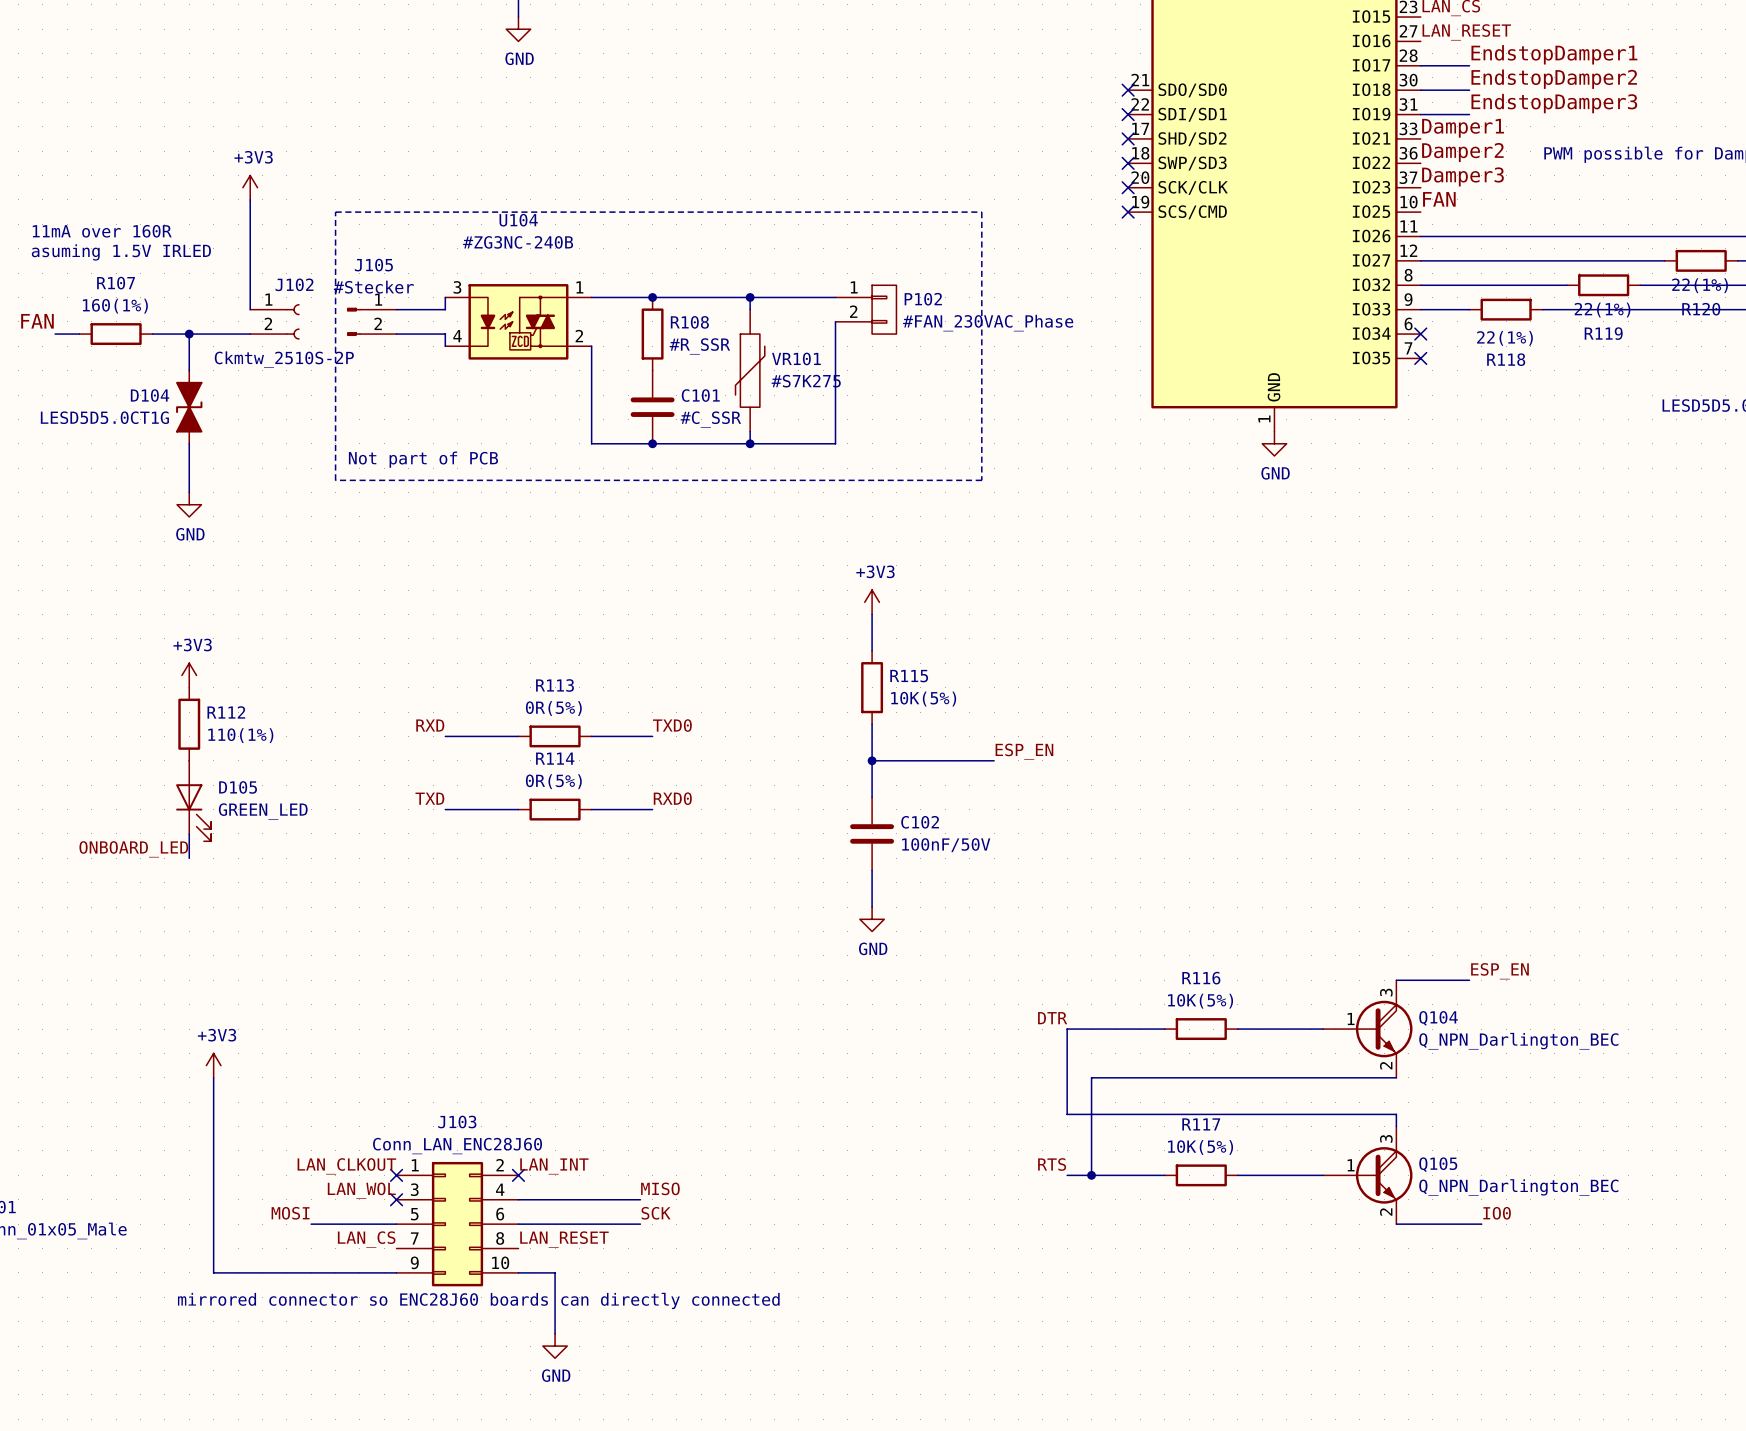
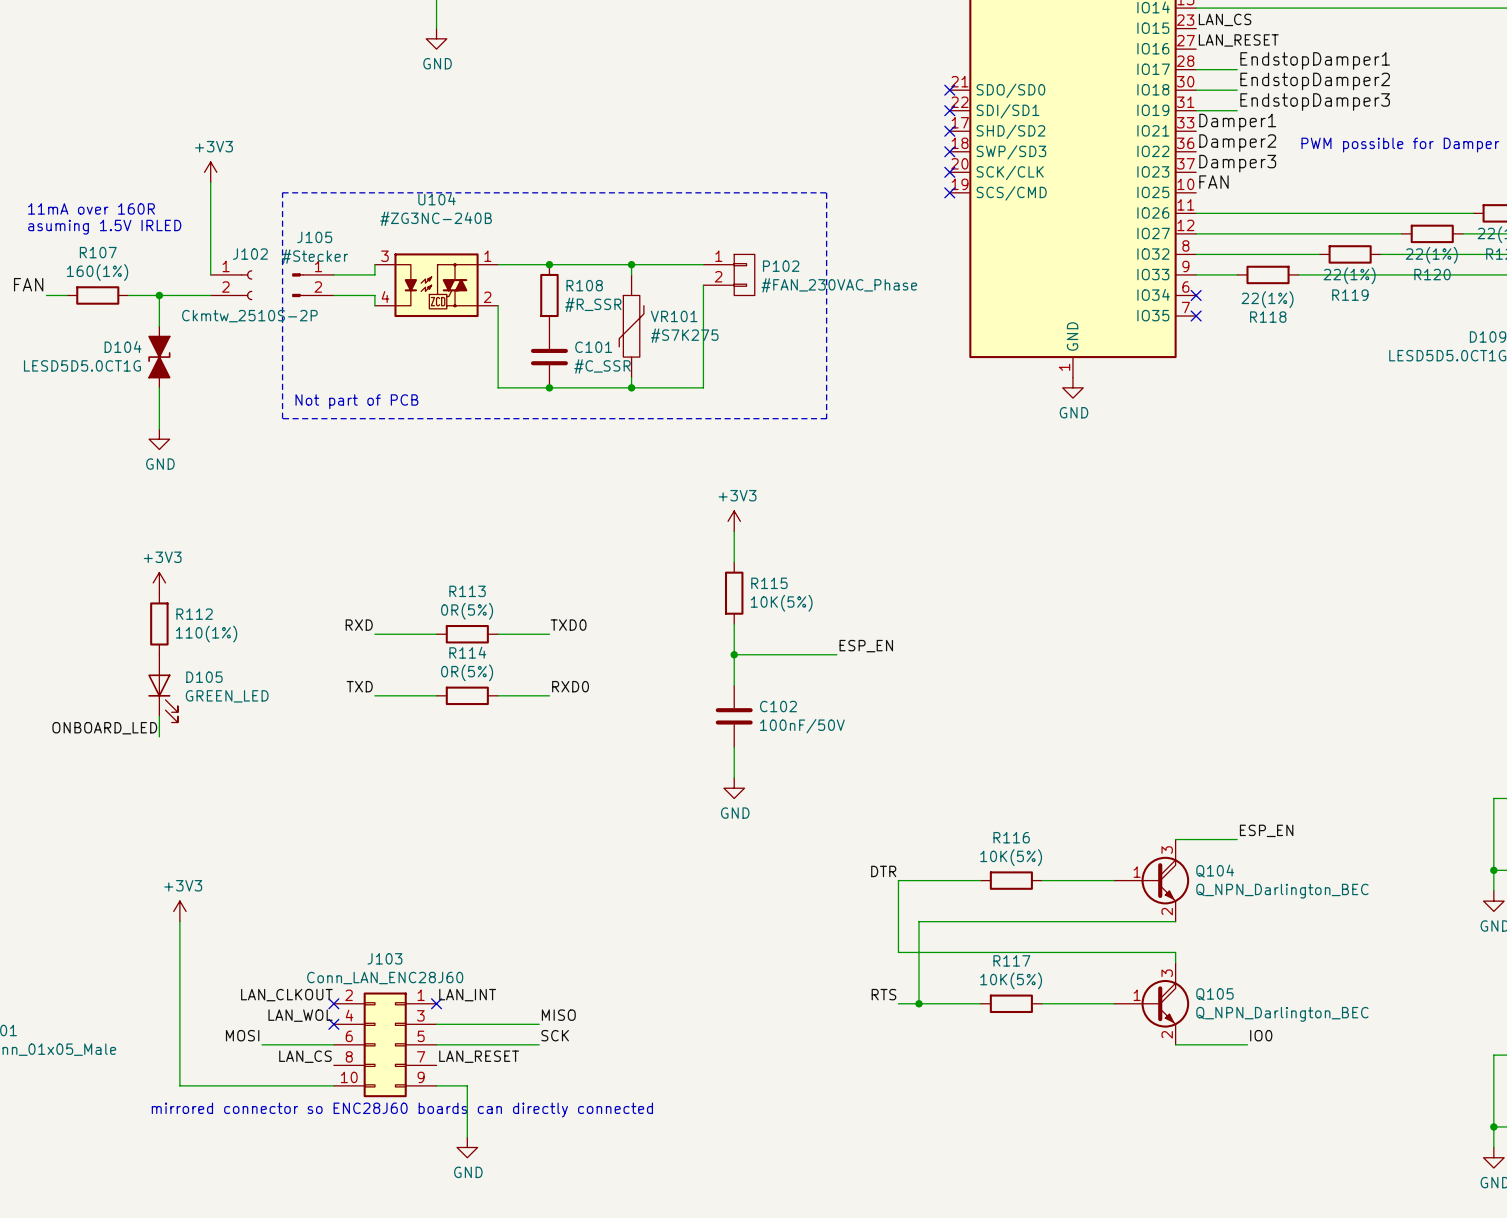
J103 flip: as is (457, 1224) -> left-right (385, 1044)

